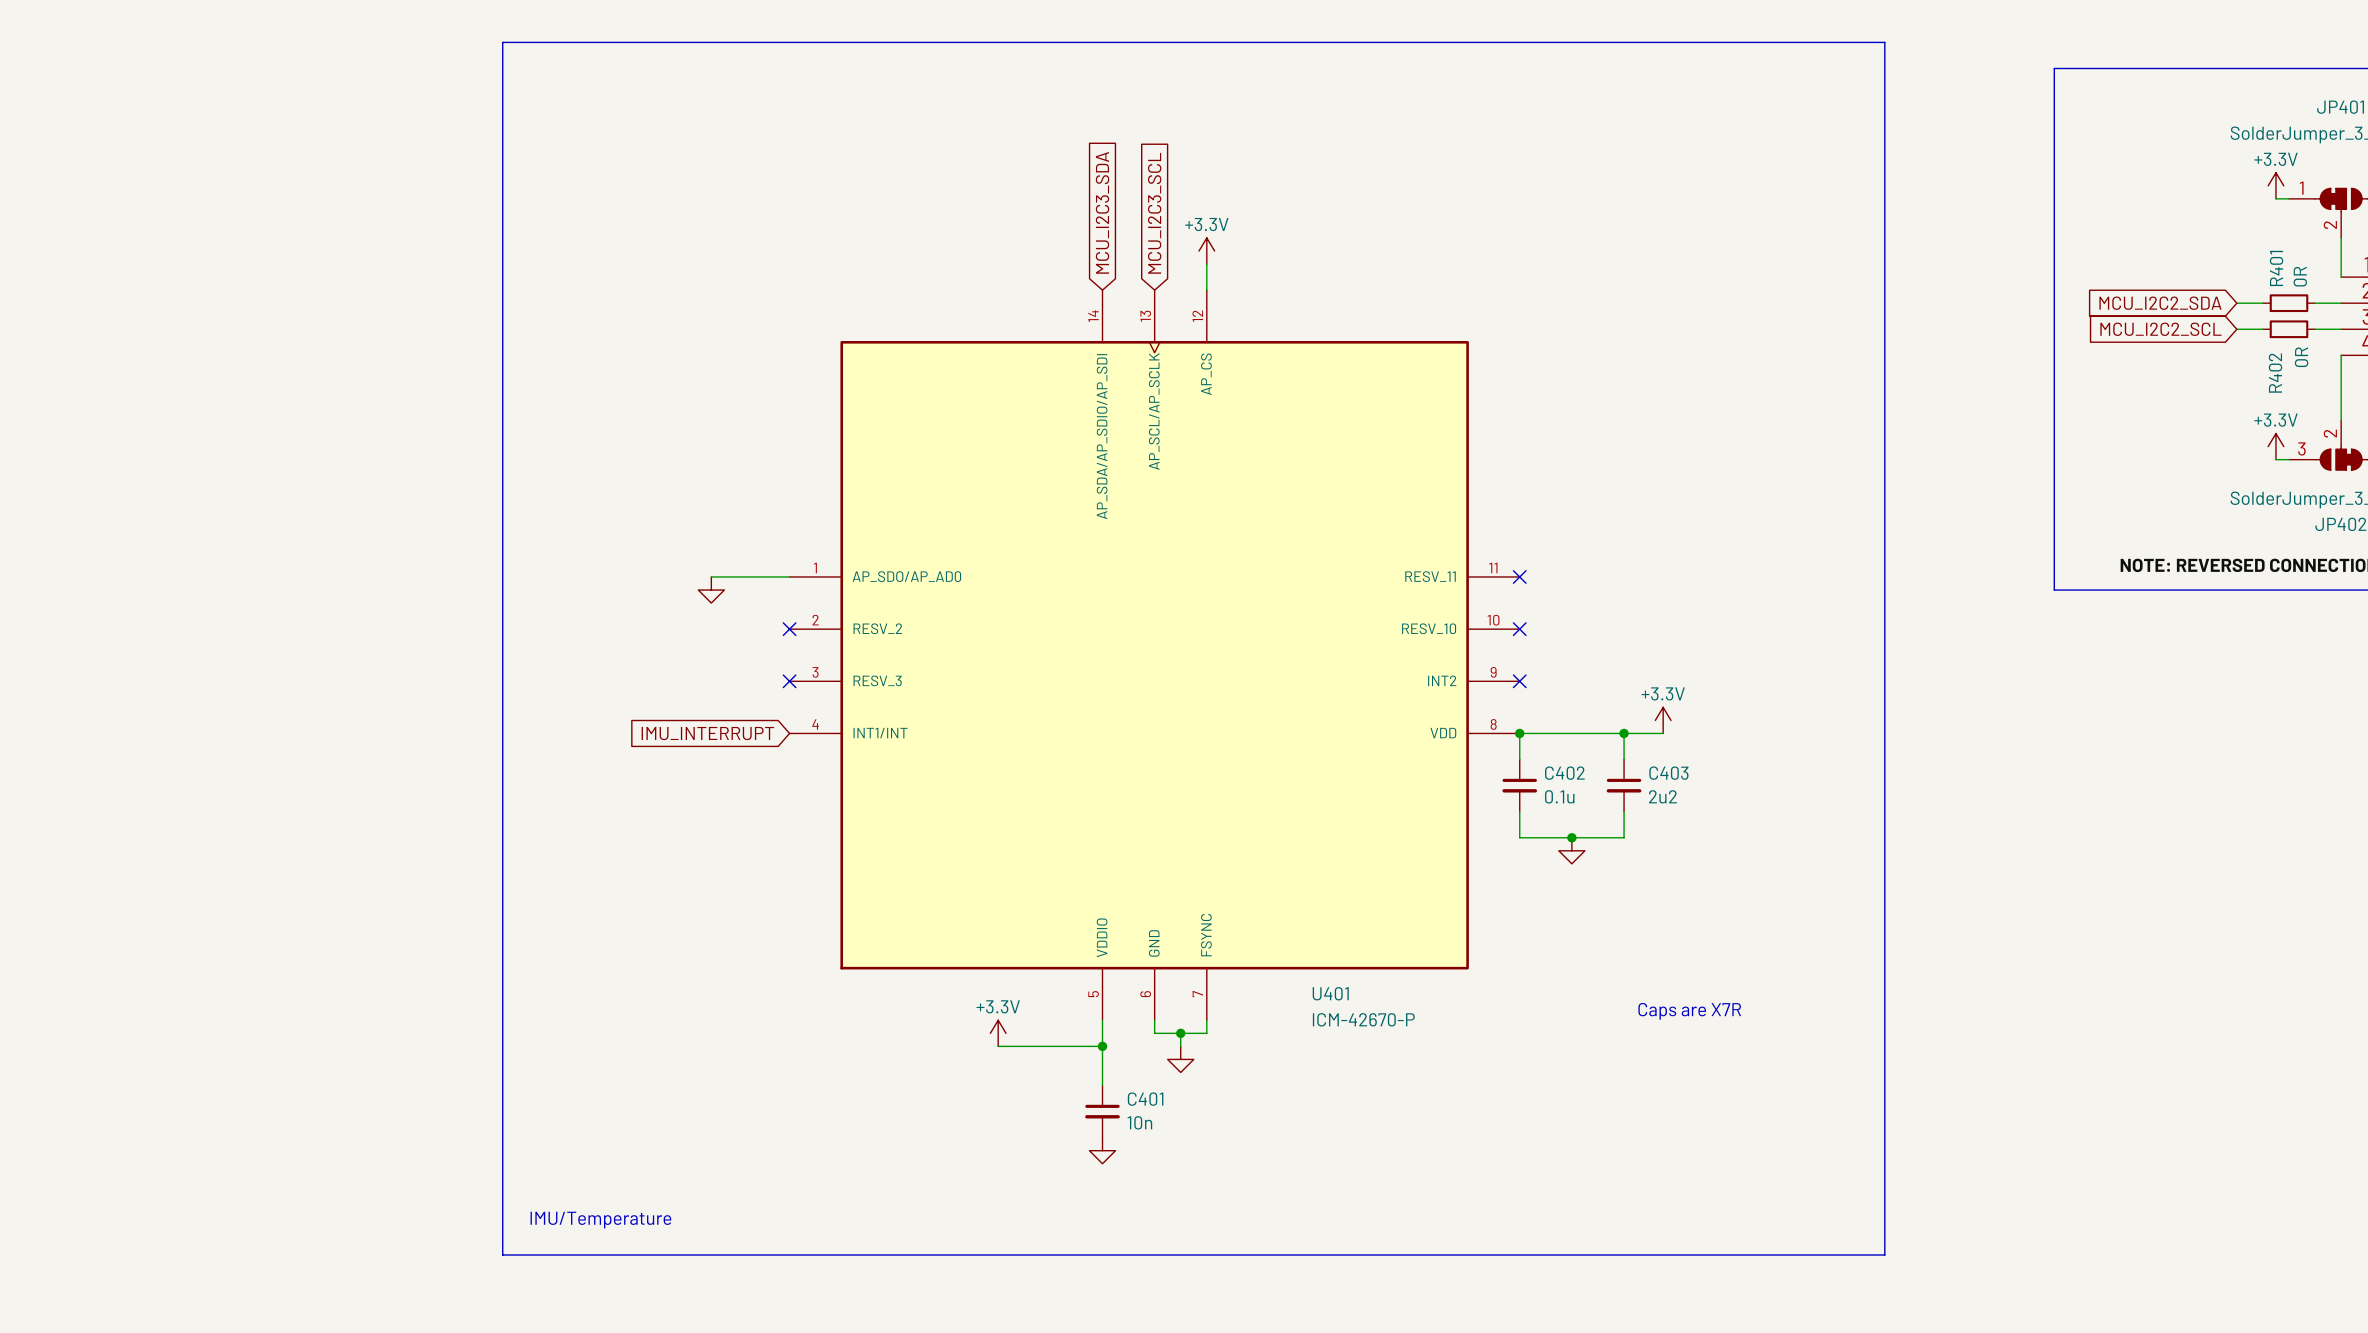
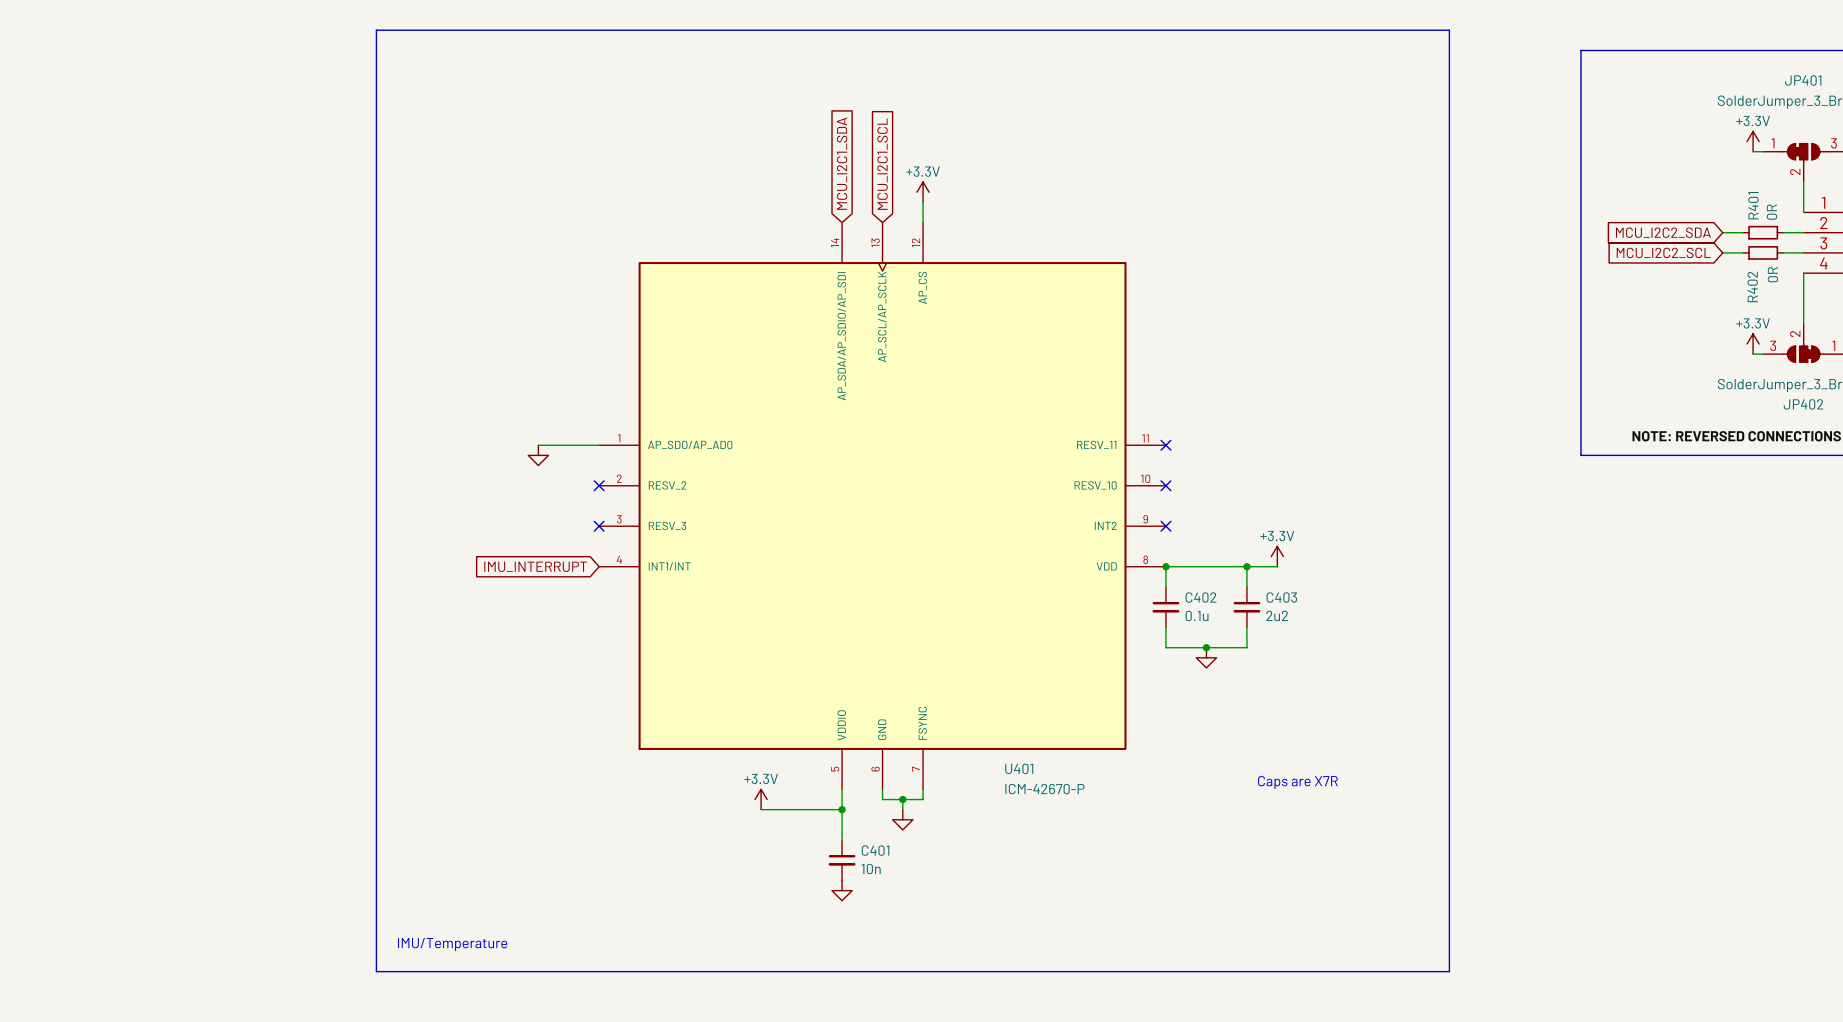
global label: MCU_I2C3_SDA (1102, 212) -> MCU_I2C1_SDA (842, 163)
global label: MCU_I2C3_SCL (1154, 213) -> MCU_I2C1_SCL (882, 164)

